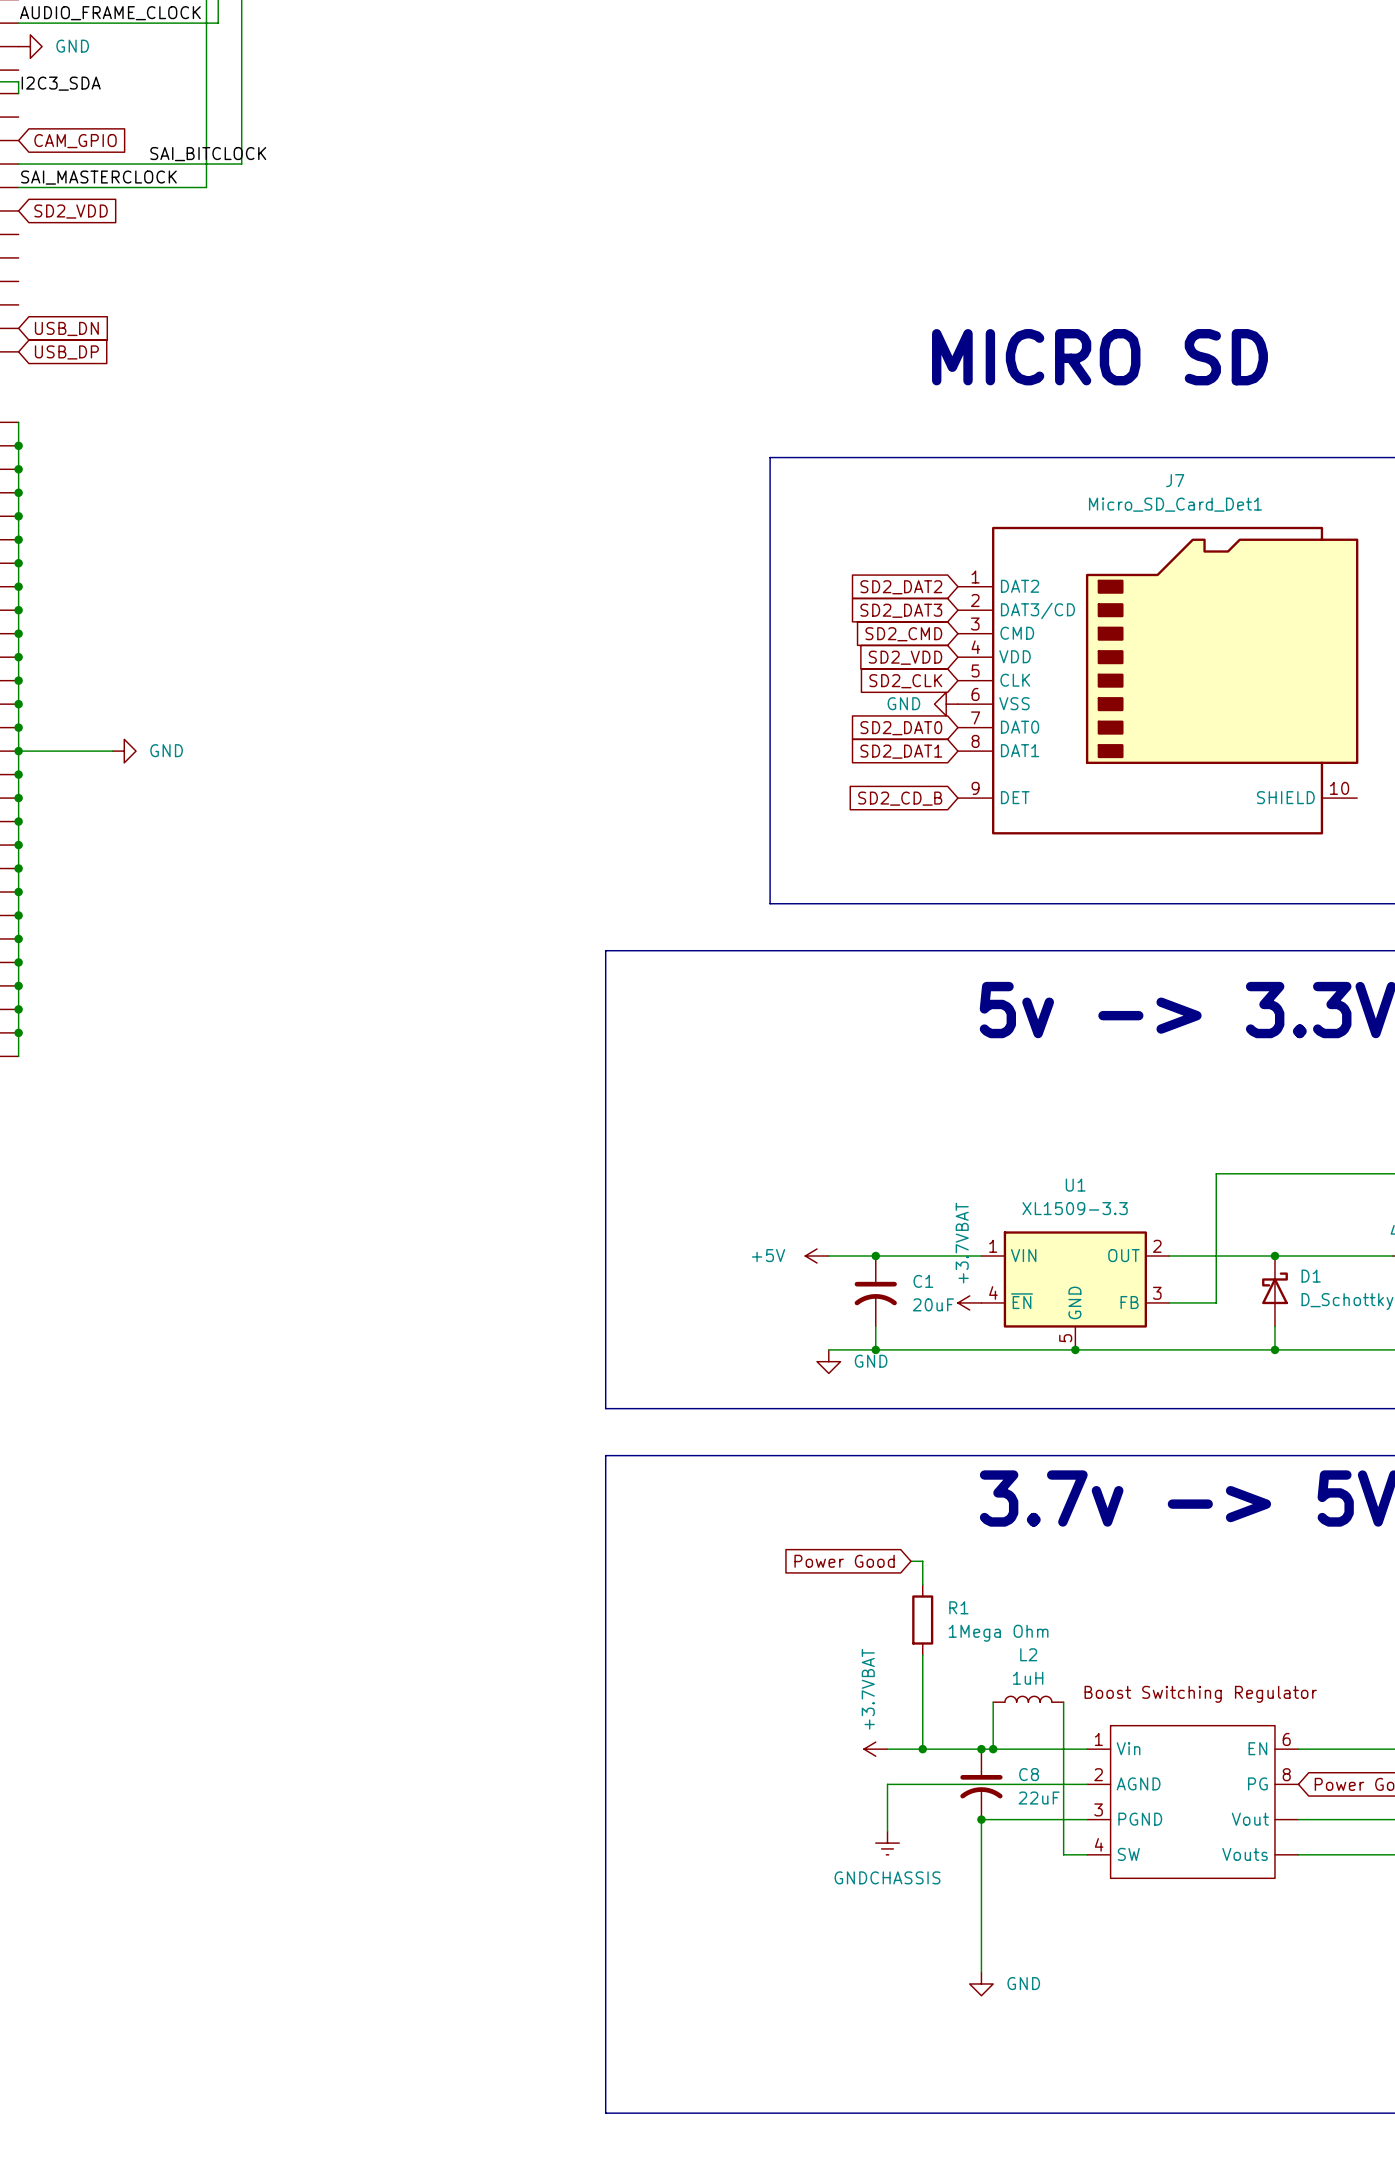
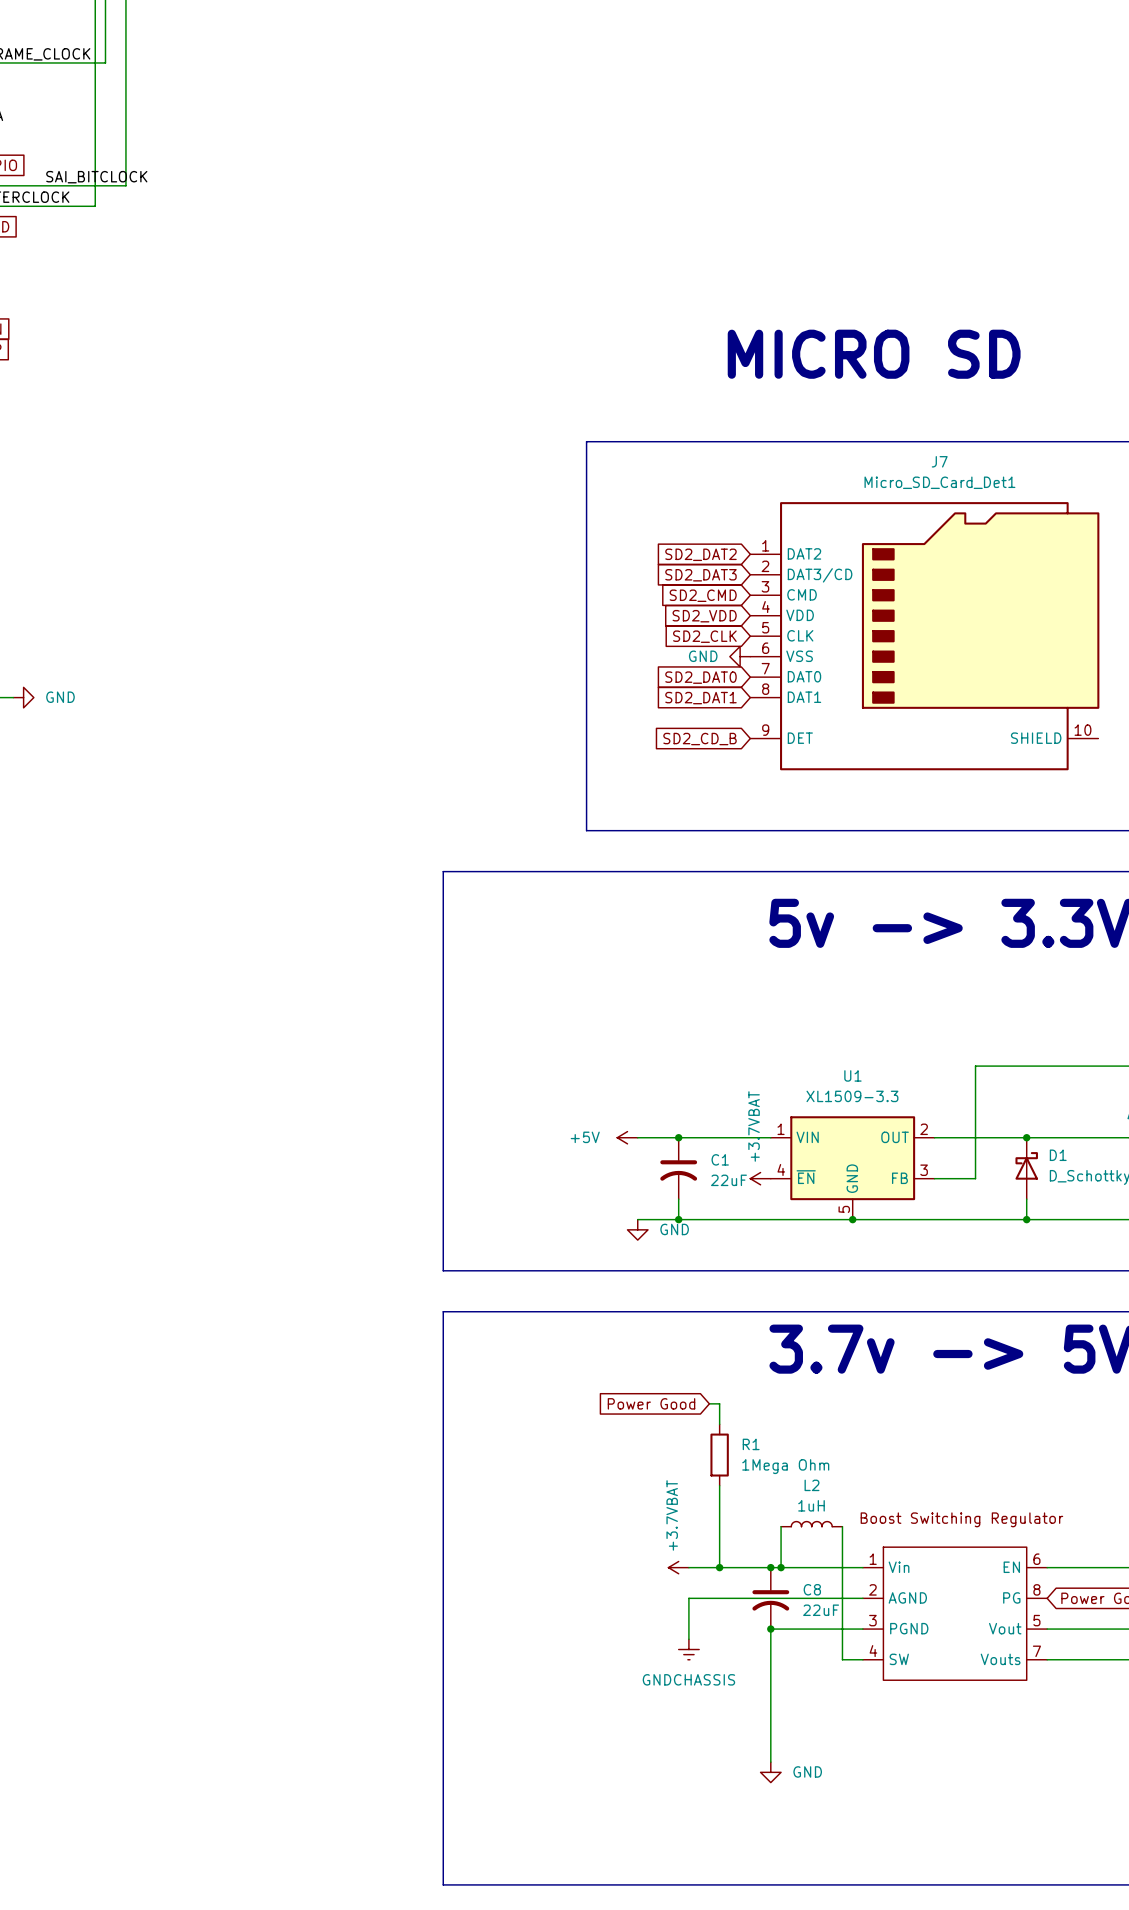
C1 value: 20uF (933, 1304) -> 22uF (728, 1180)
part pin number: none -> 5 (1036, 1620)
part pin number: none -> 7 (1036, 1651)

